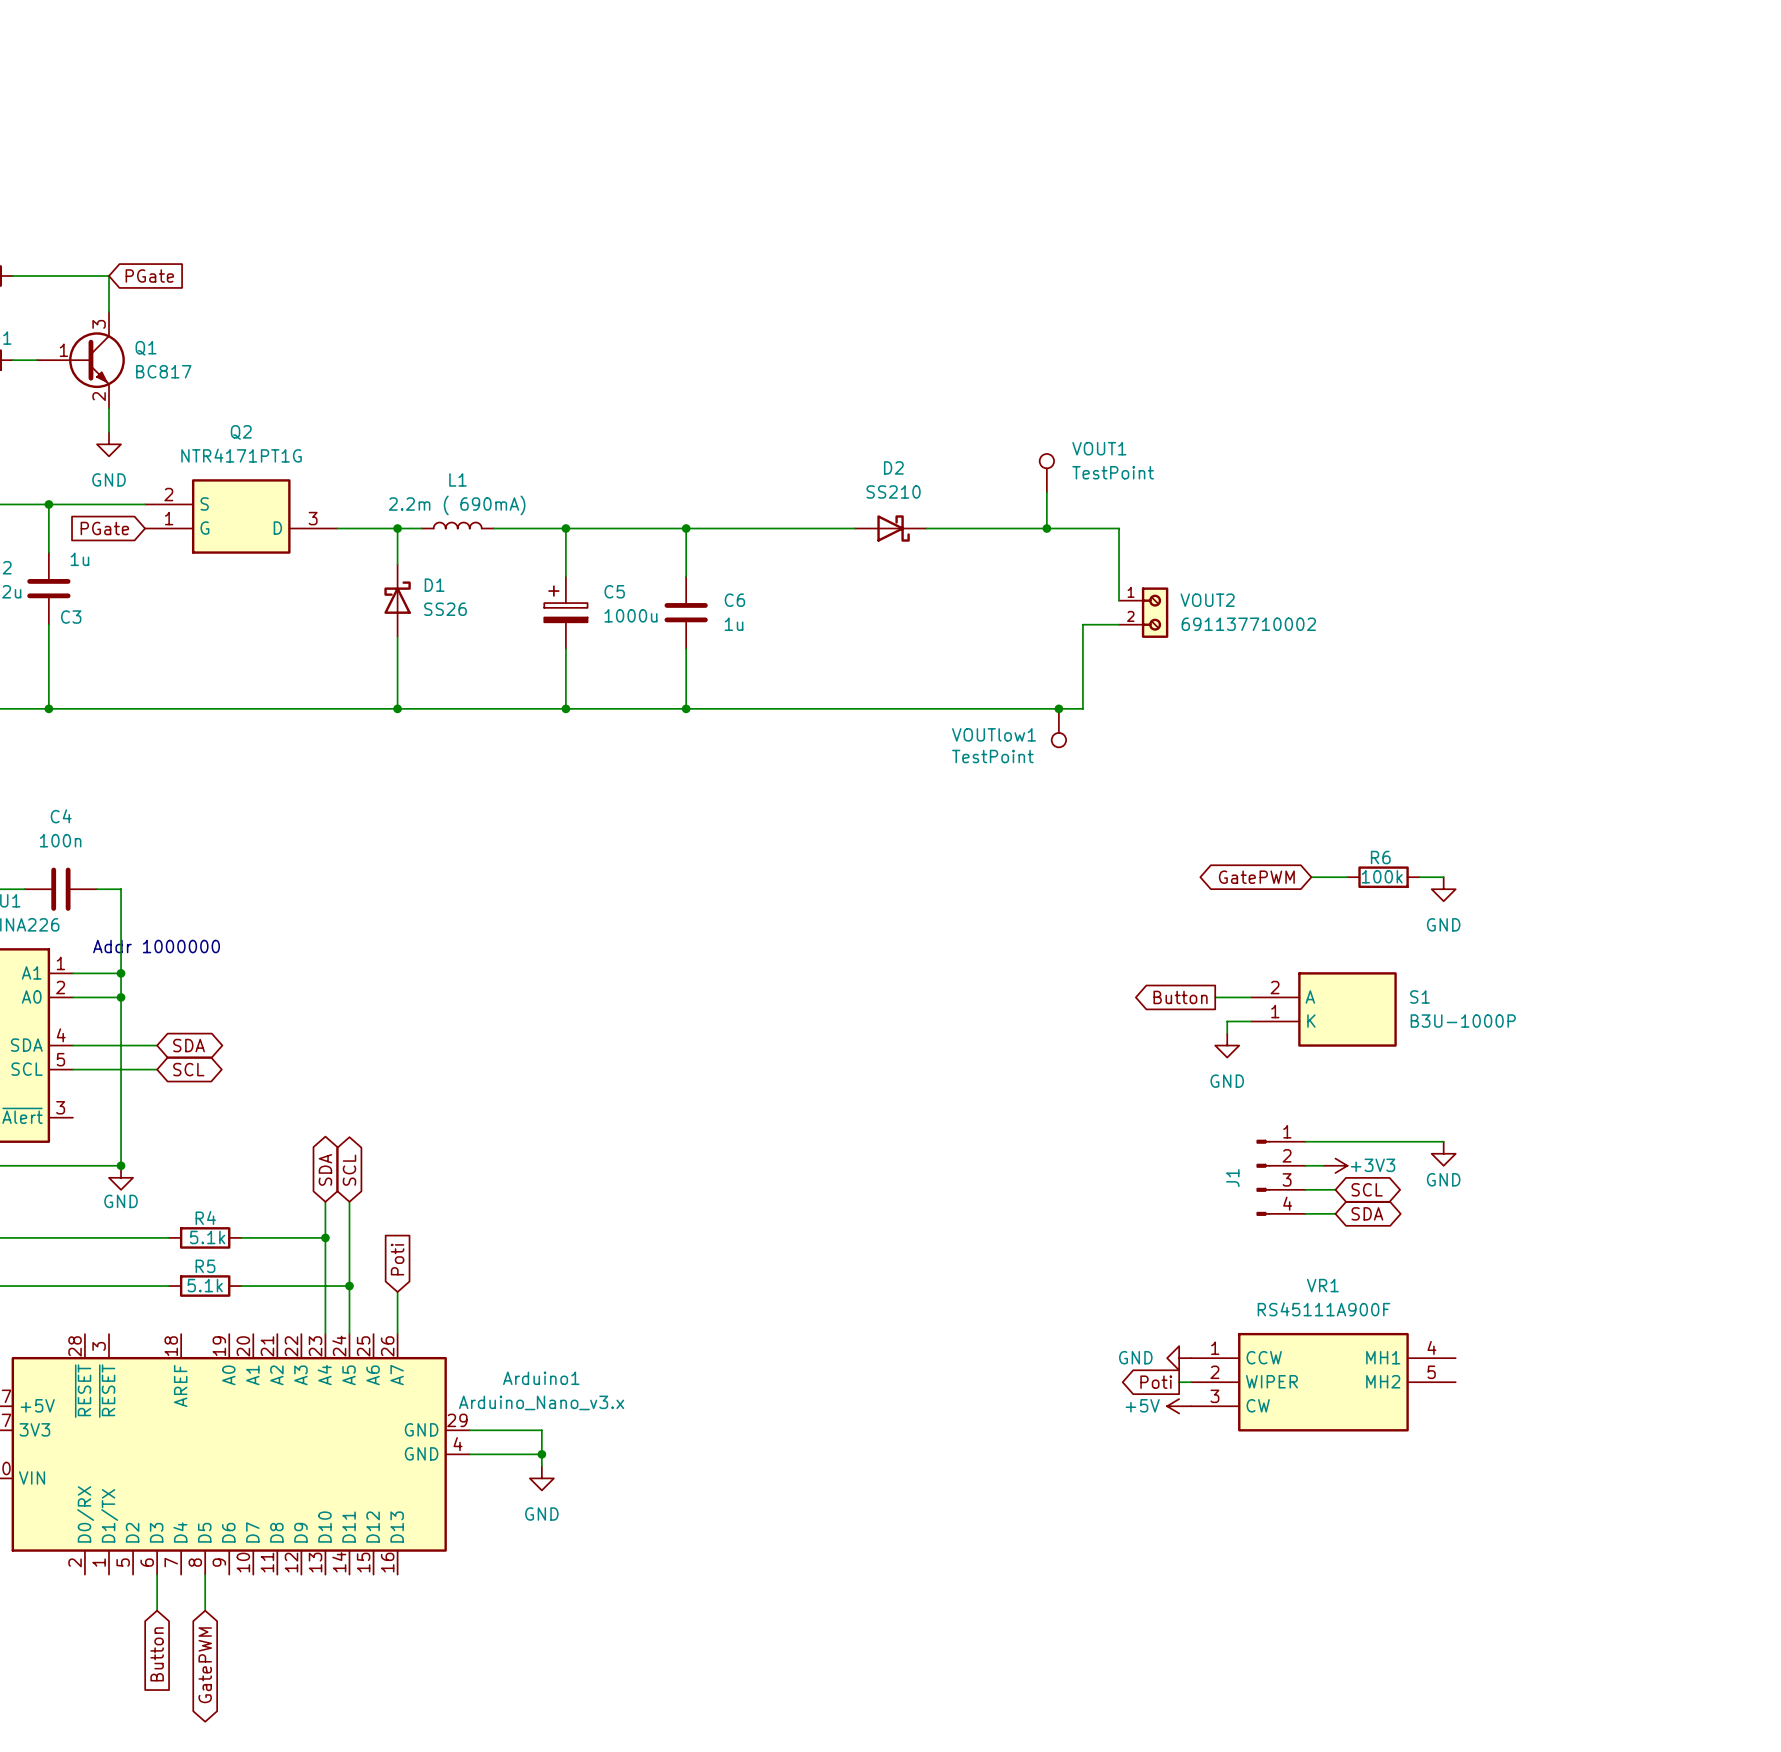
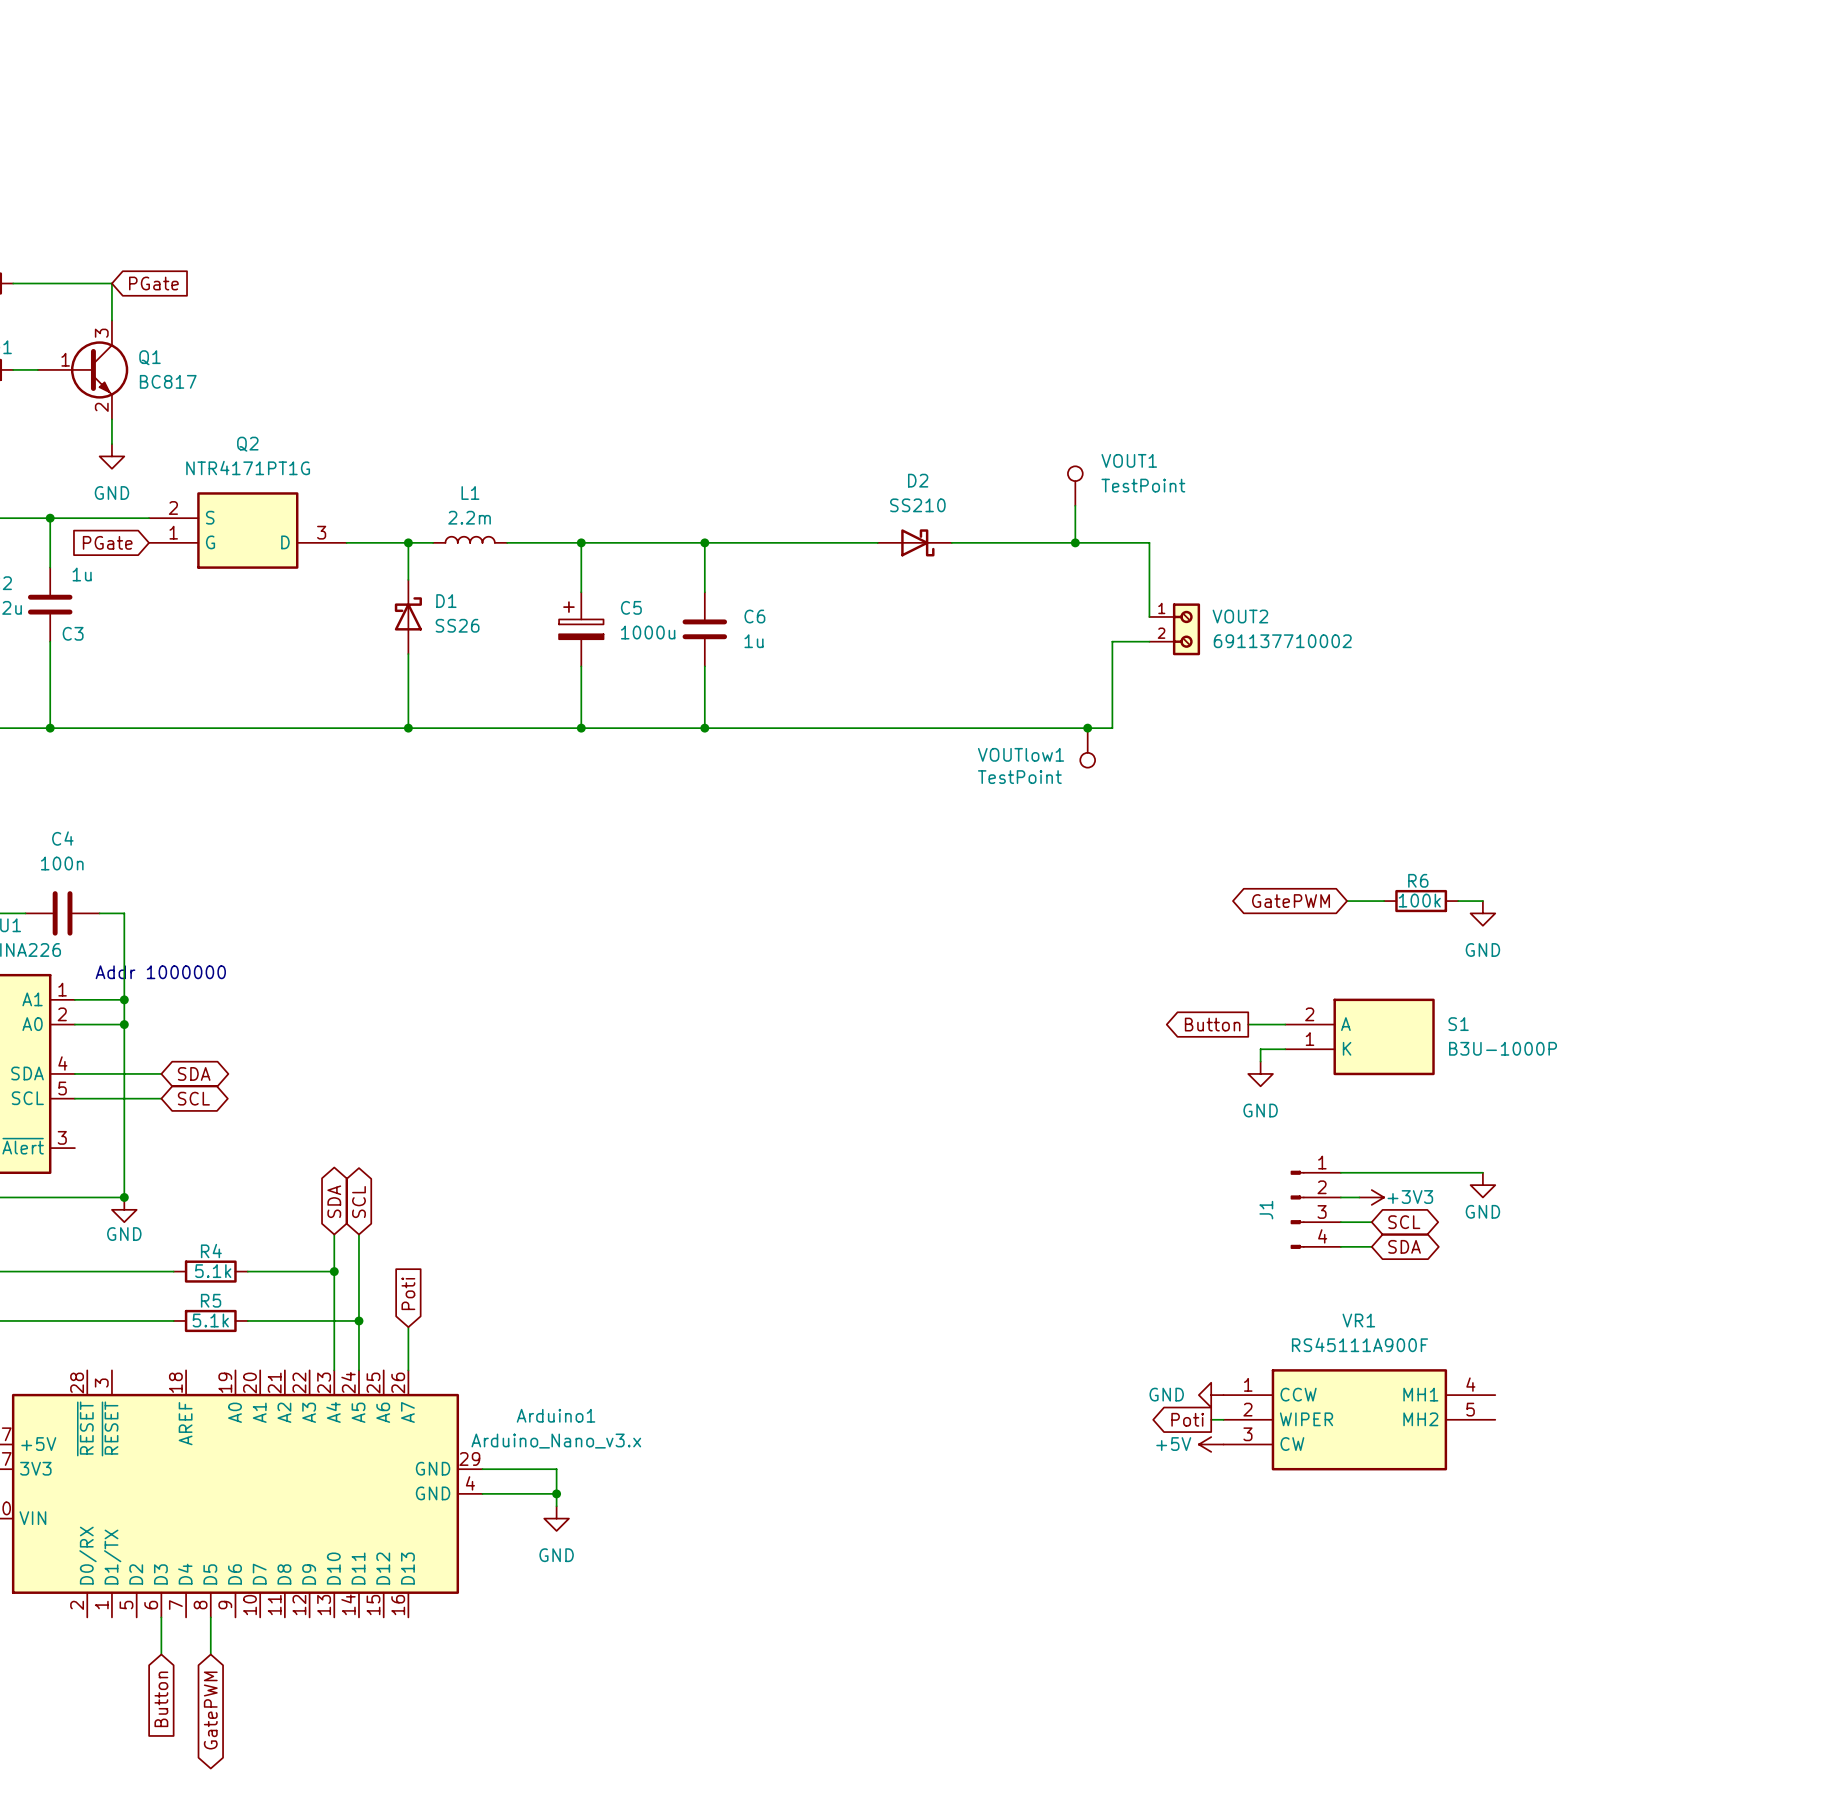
L1 value: 2.2m ( 690mA) (457, 505) -> 2.2m (469, 517)

